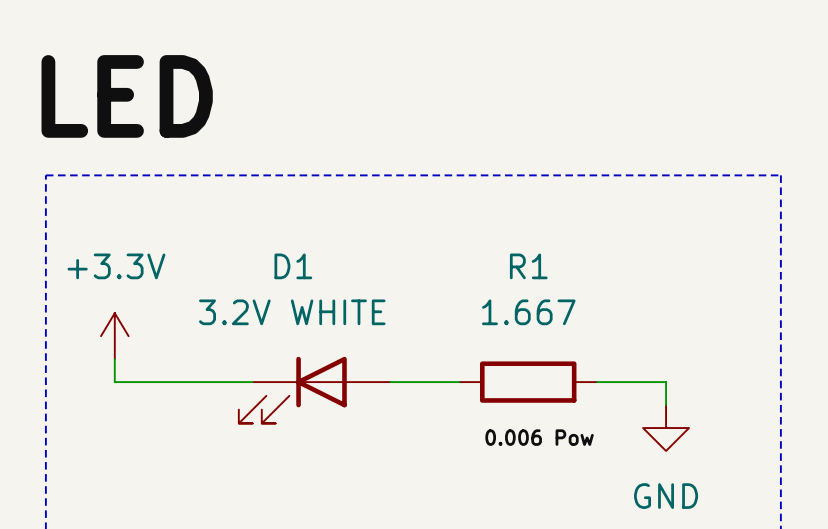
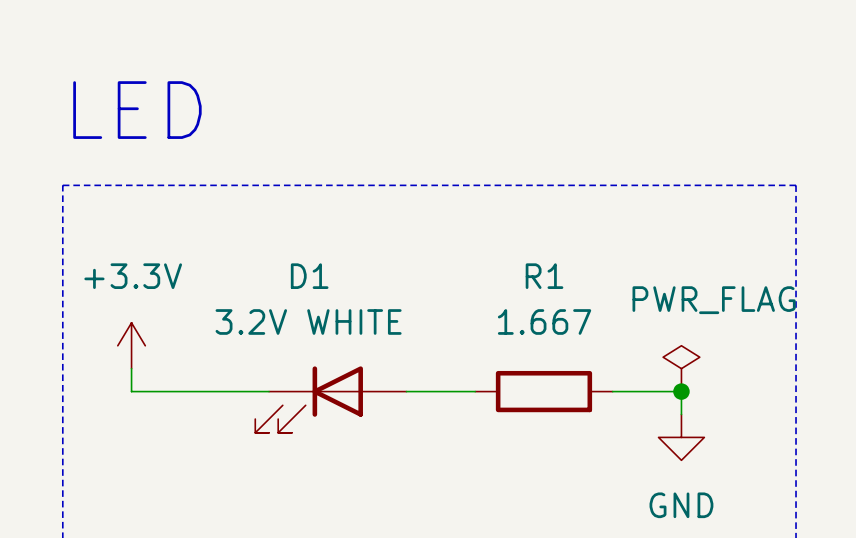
label: LED (127, 96) -> none
text: none -> LED (137, 110)
power symbol: none -> PWR_FLAG (681, 368)
junction: none -> (681, 391)
label: 0.006 Pow (539, 437) -> none

